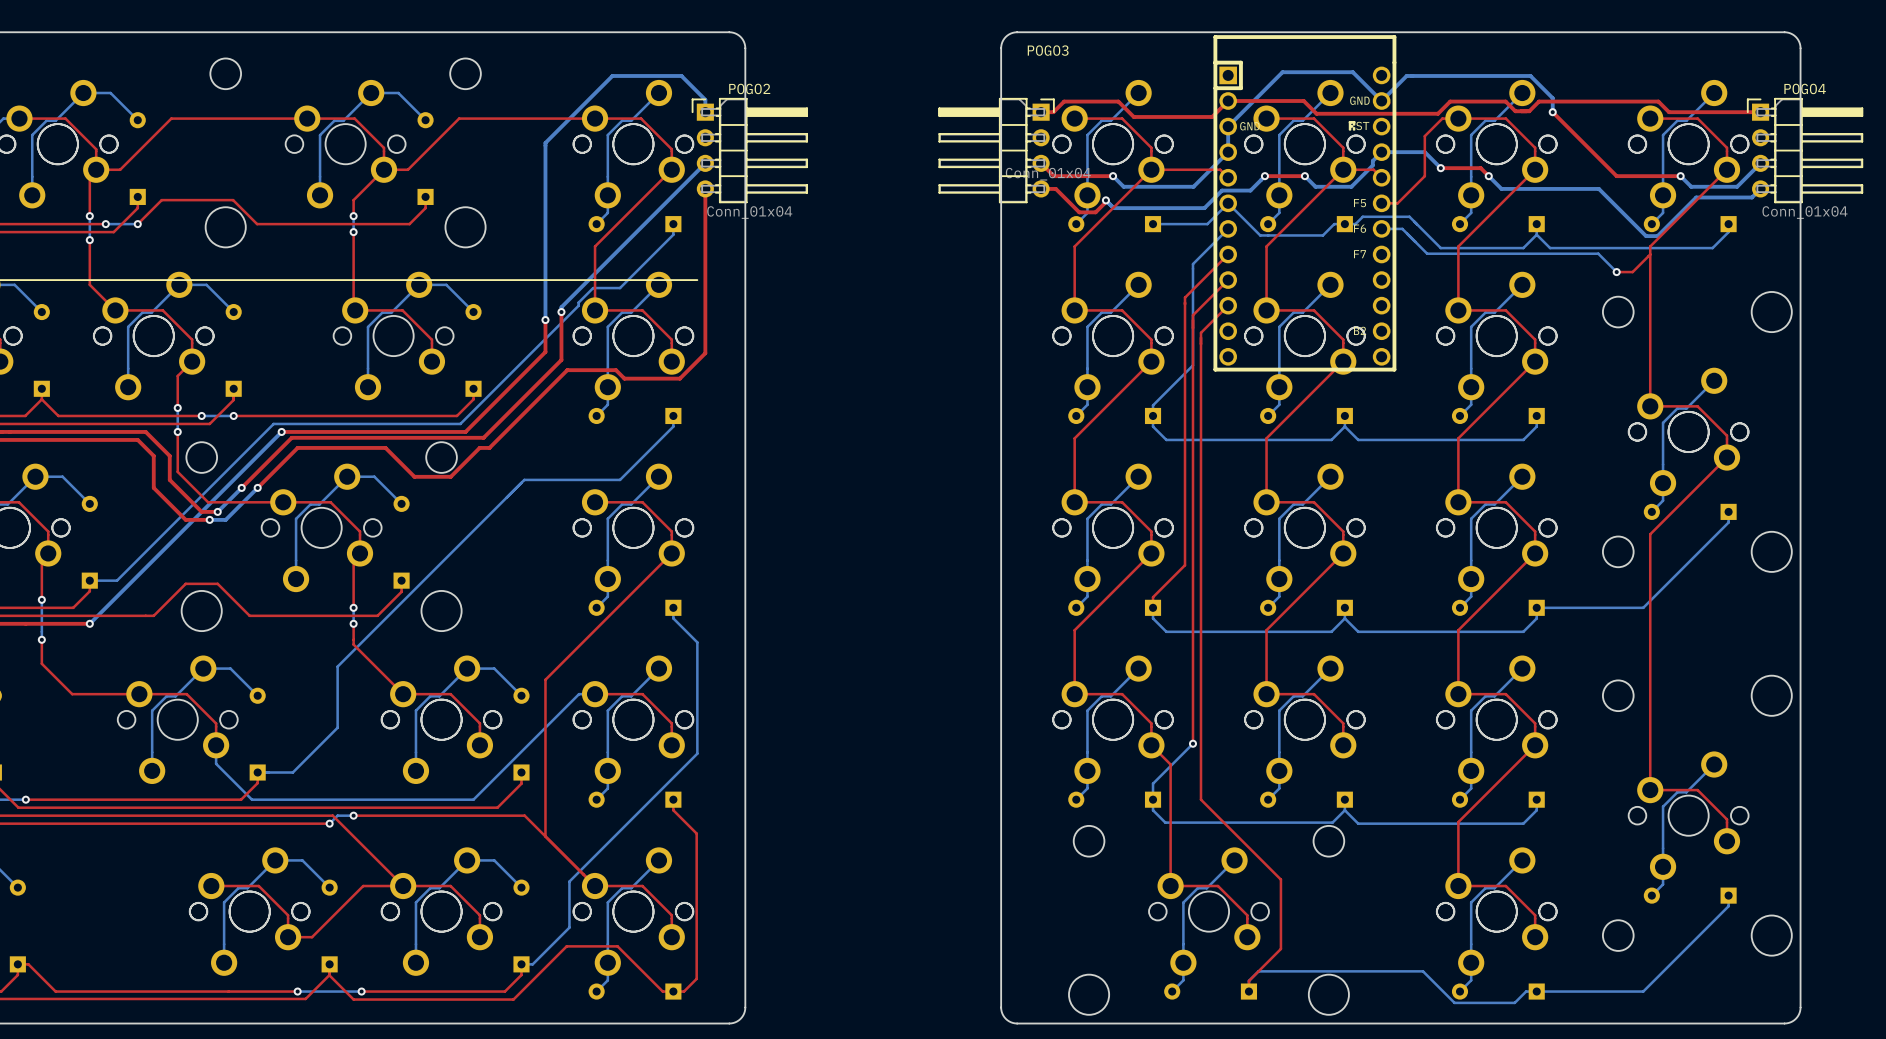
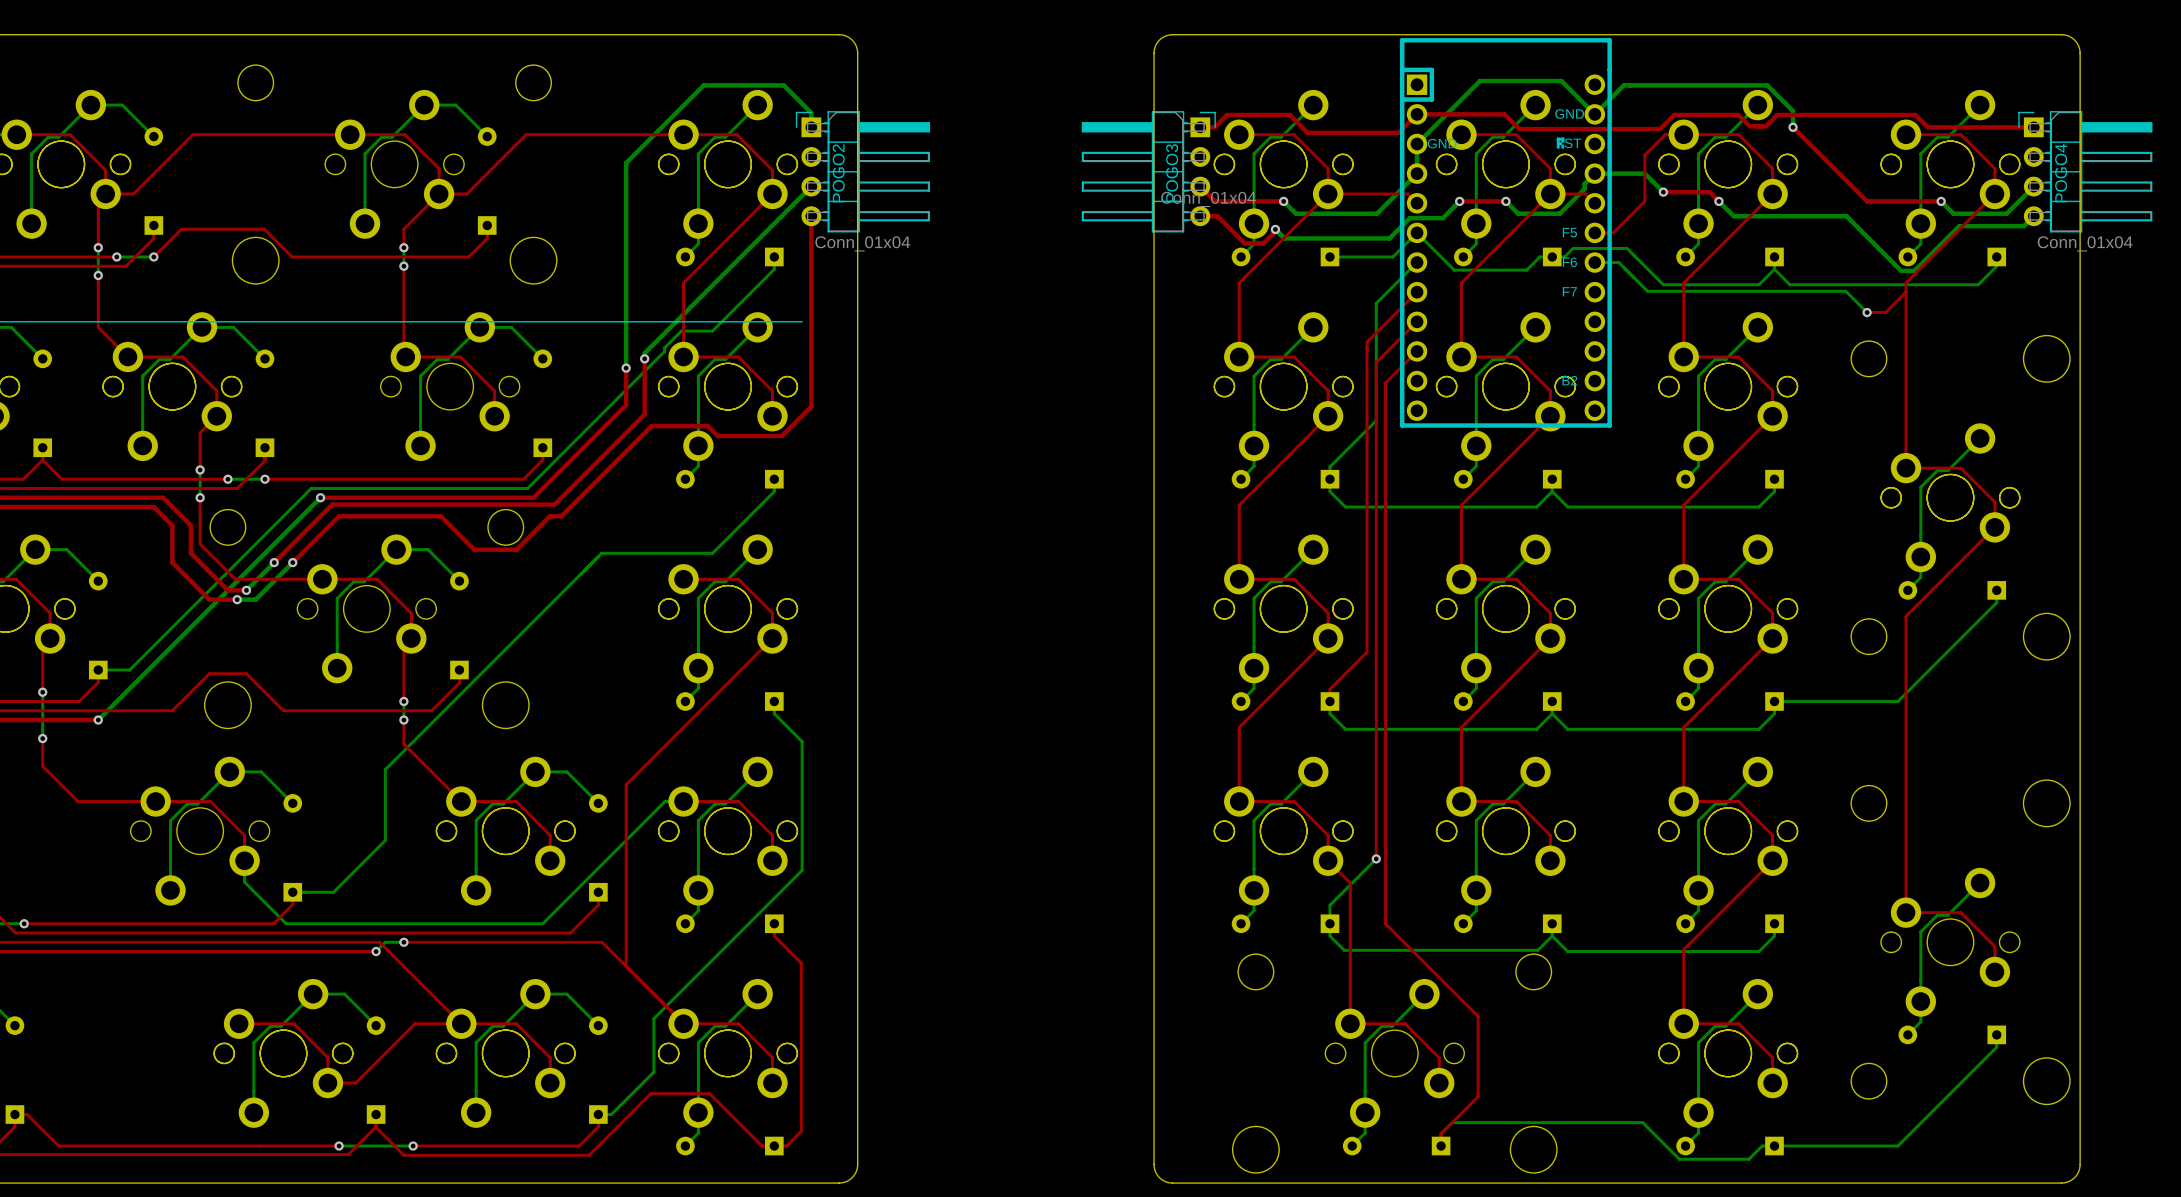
POGO3 name rotation: 0° (1048, 50) -> 90° counterclockwise (1172, 173)
POGO3 name position: POGO3 (1048, 50) -> POGO3 (1172, 173)
POGO2 name rotation: 0° (749, 88) -> 90° counterclockwise (838, 173)
POGO2 name position: POGO2 (749, 88) -> POGO2 (838, 173)
POGO4 name rotation: 0° (1805, 88) -> 90° counterclockwise (2061, 173)
POGO4 name position: POGO4 (1805, 88) -> POGO4 (2061, 173)

